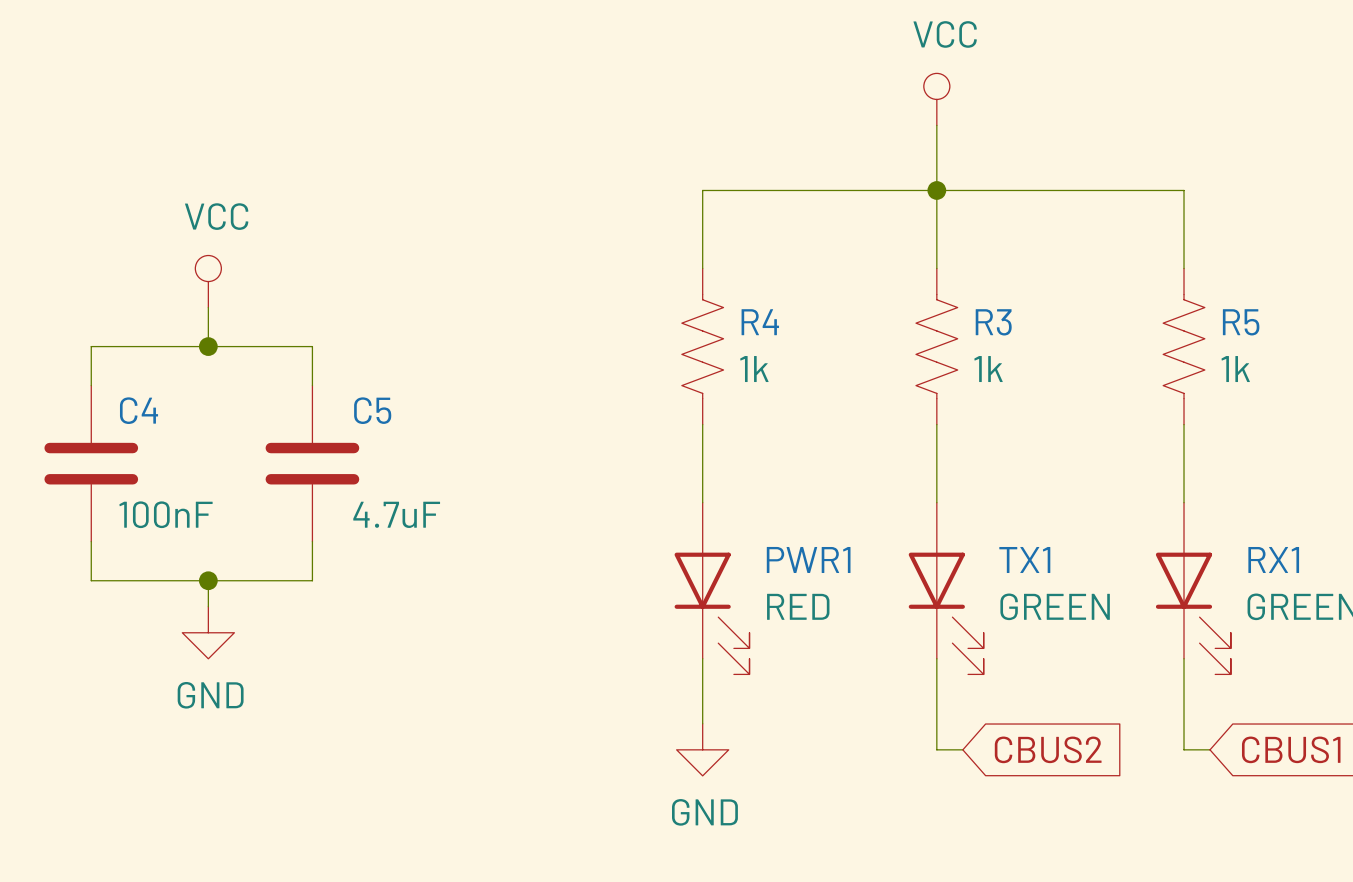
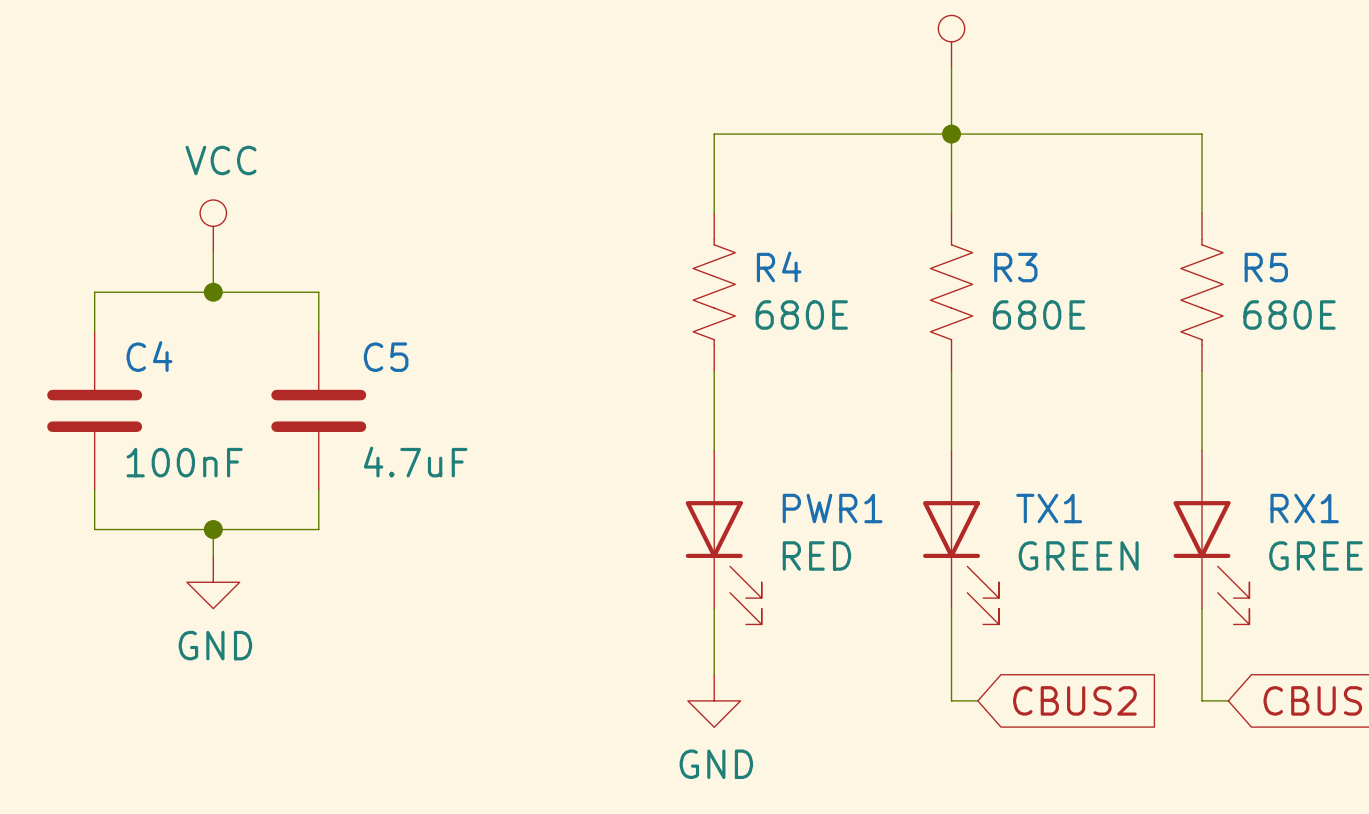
R4 value: 1k (754, 369) -> 680E (801, 314)
R3 value: 1k (988, 369) -> 680E (1039, 314)
R5 value: 1k (1235, 369) -> 680E (1289, 314)

